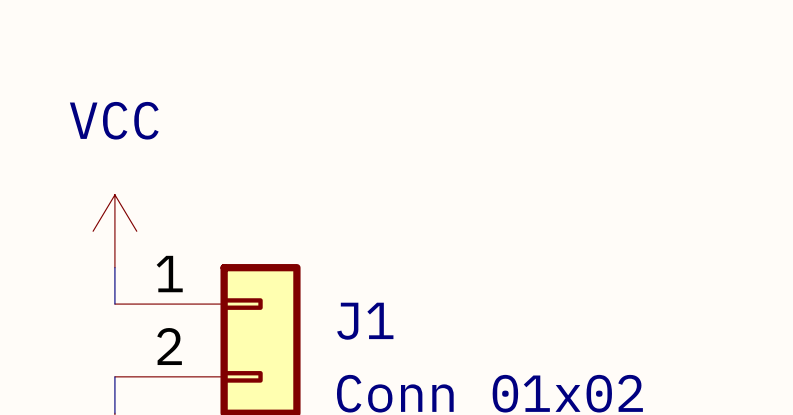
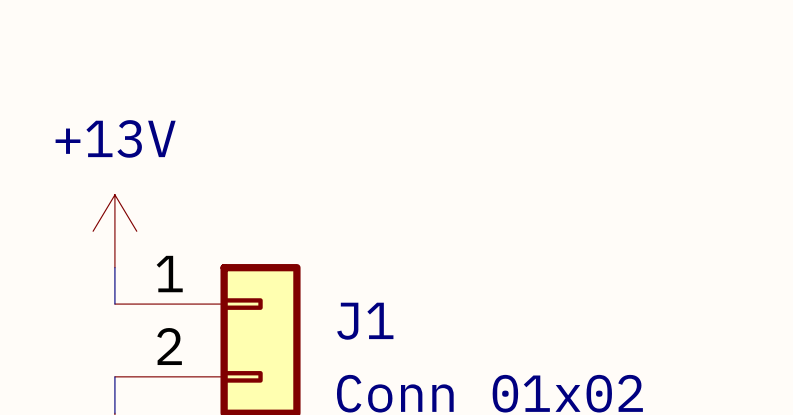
power symbol: VCC (114, 231) -> +13V (114, 231)

